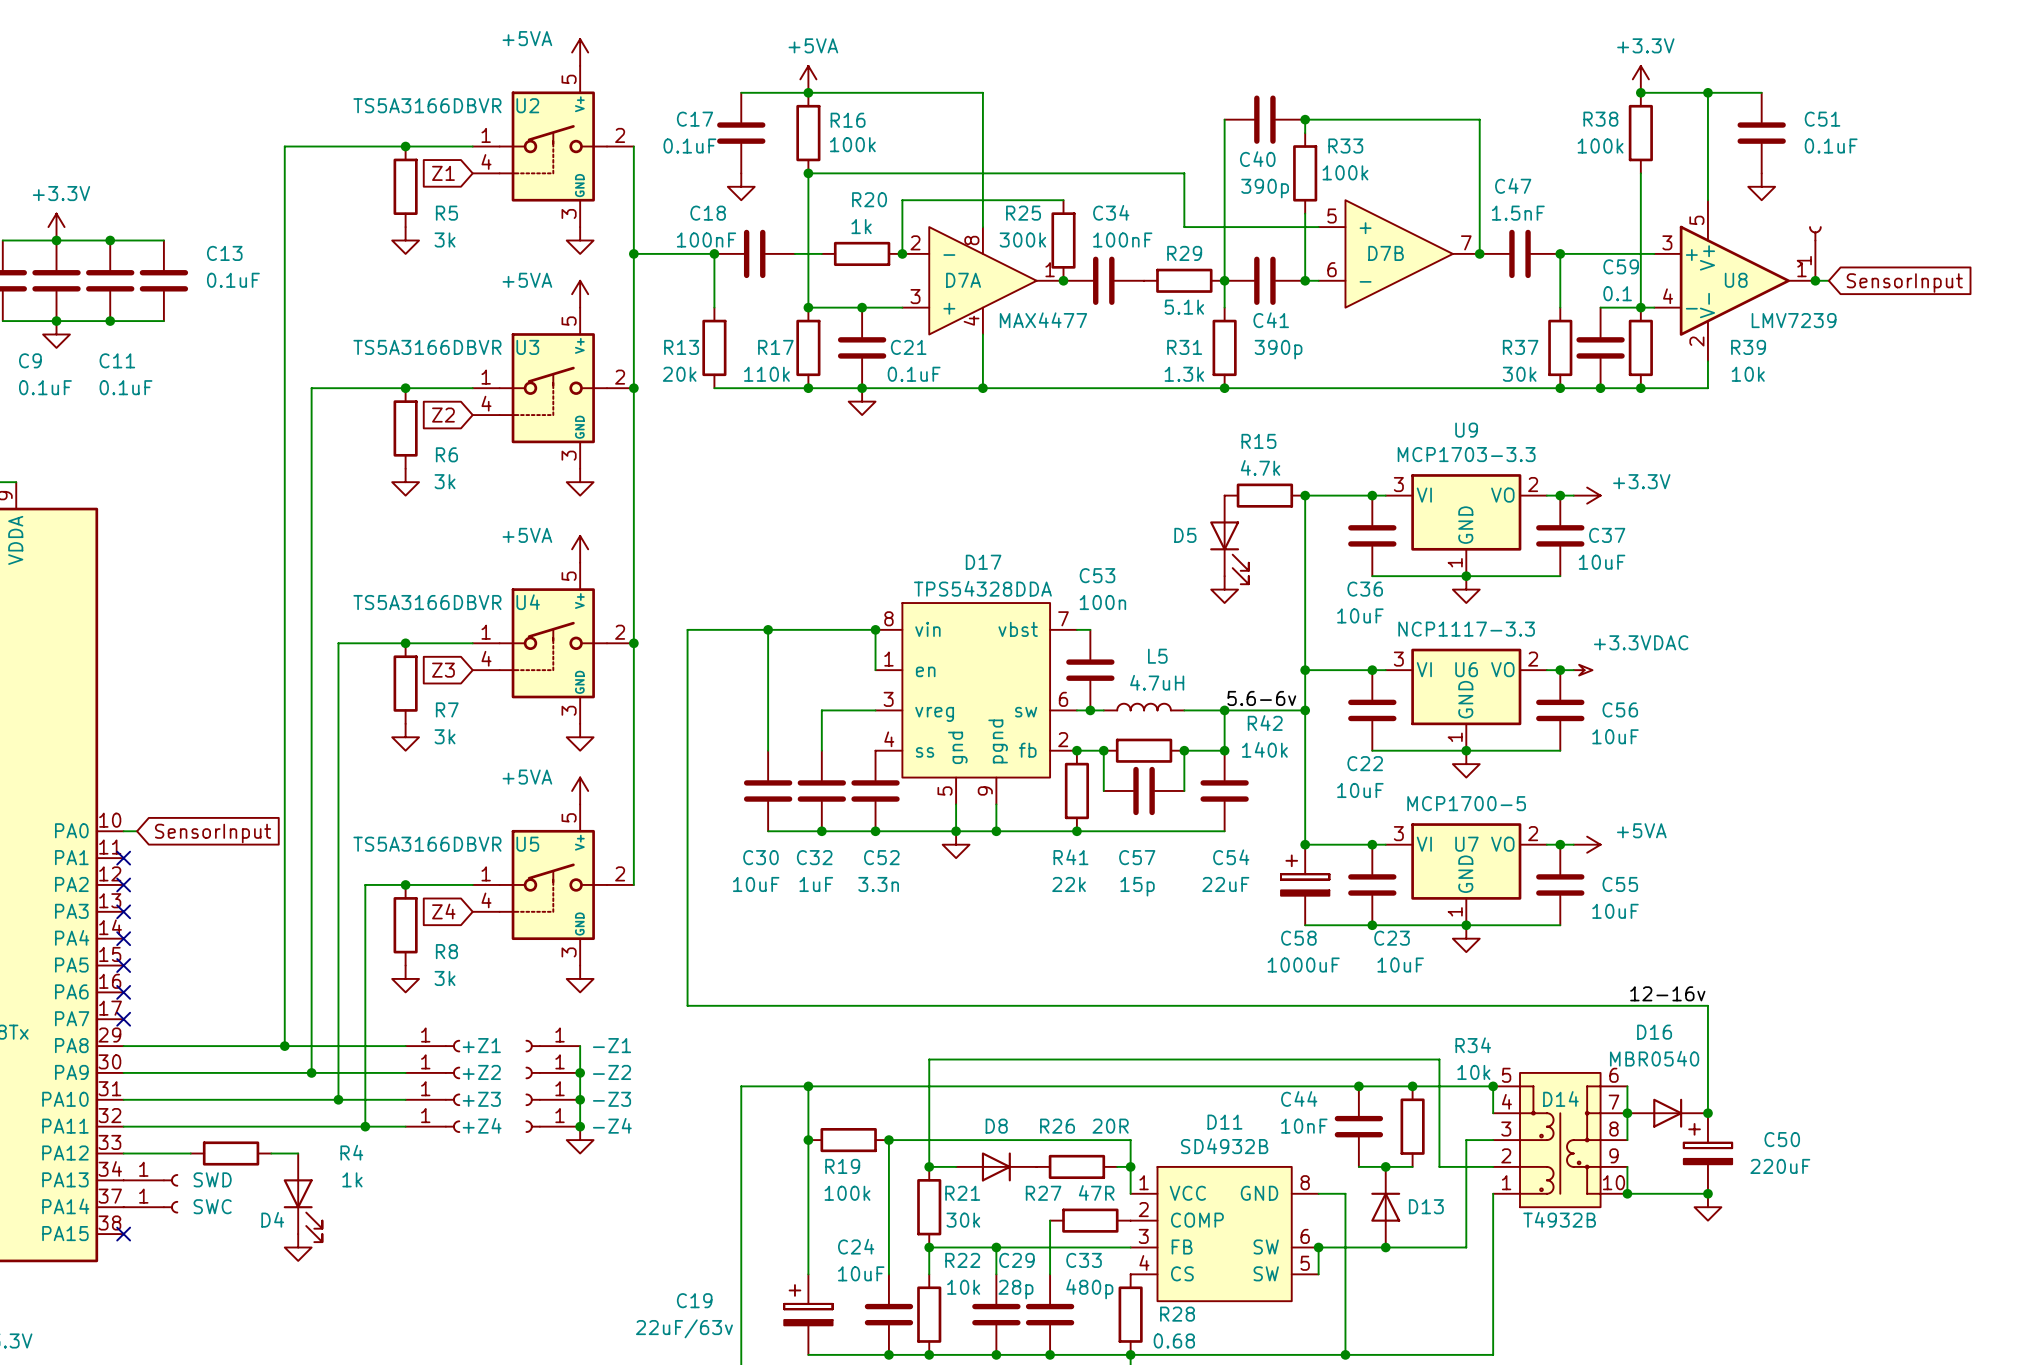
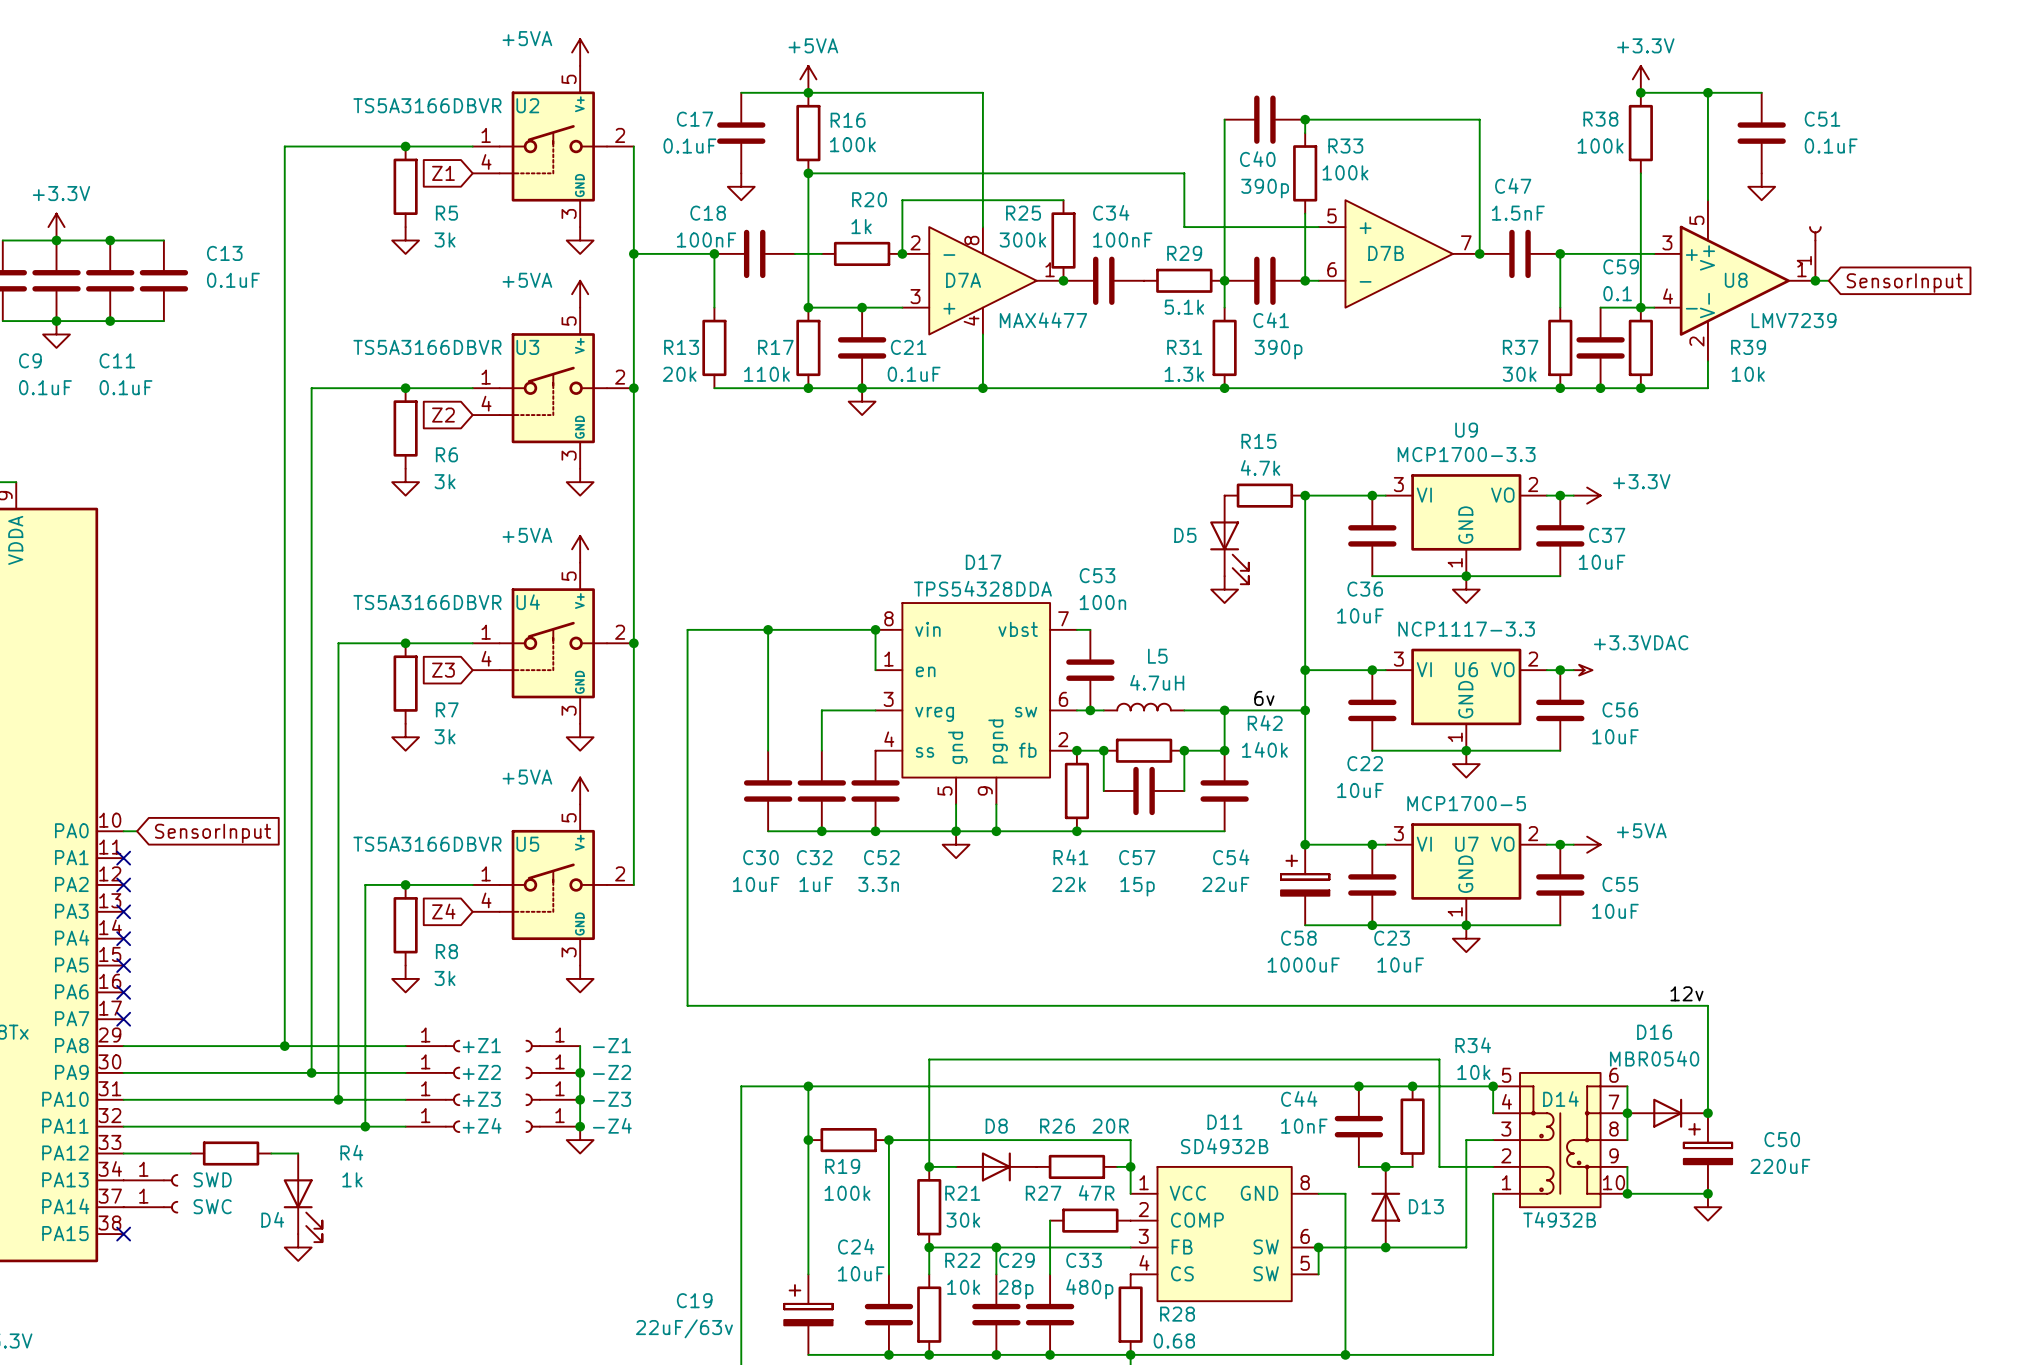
U9 value: MCP1703-3.3 (1466, 454) -> MCP1700-3.3 (1466, 454)
label: 5.6-6v (1261, 698) -> none
label: none -> 6v (1264, 698)
label: 12-16v (1667, 993) -> 12v (1686, 993)

